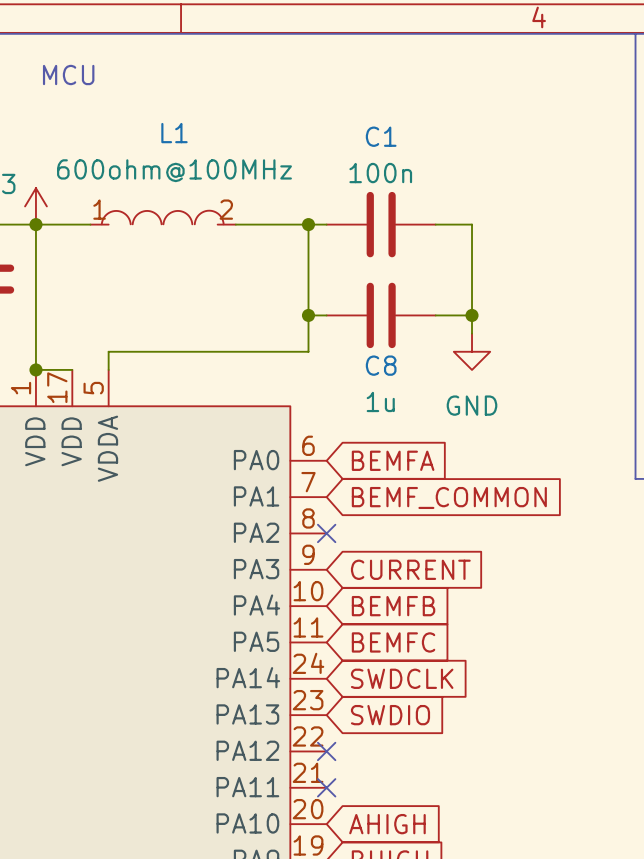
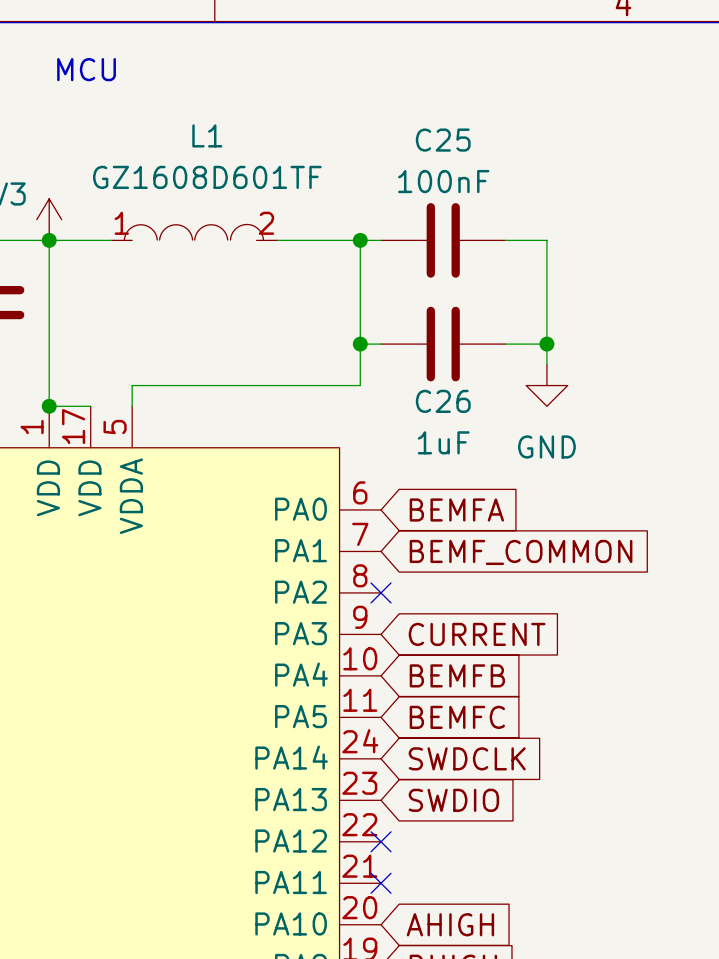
C1 name: C1 (381, 136) -> C25 (443, 140)
L1 value: 600ohm@100MHz (174, 170) -> GZ1608D601TF (207, 177)
C1 value: 100n (380, 173) -> 100nF (443, 181)
C8 name: C8 (381, 365) -> C26 (443, 401)
C8 value: 1u (380, 401) -> 1uF (443, 442)

